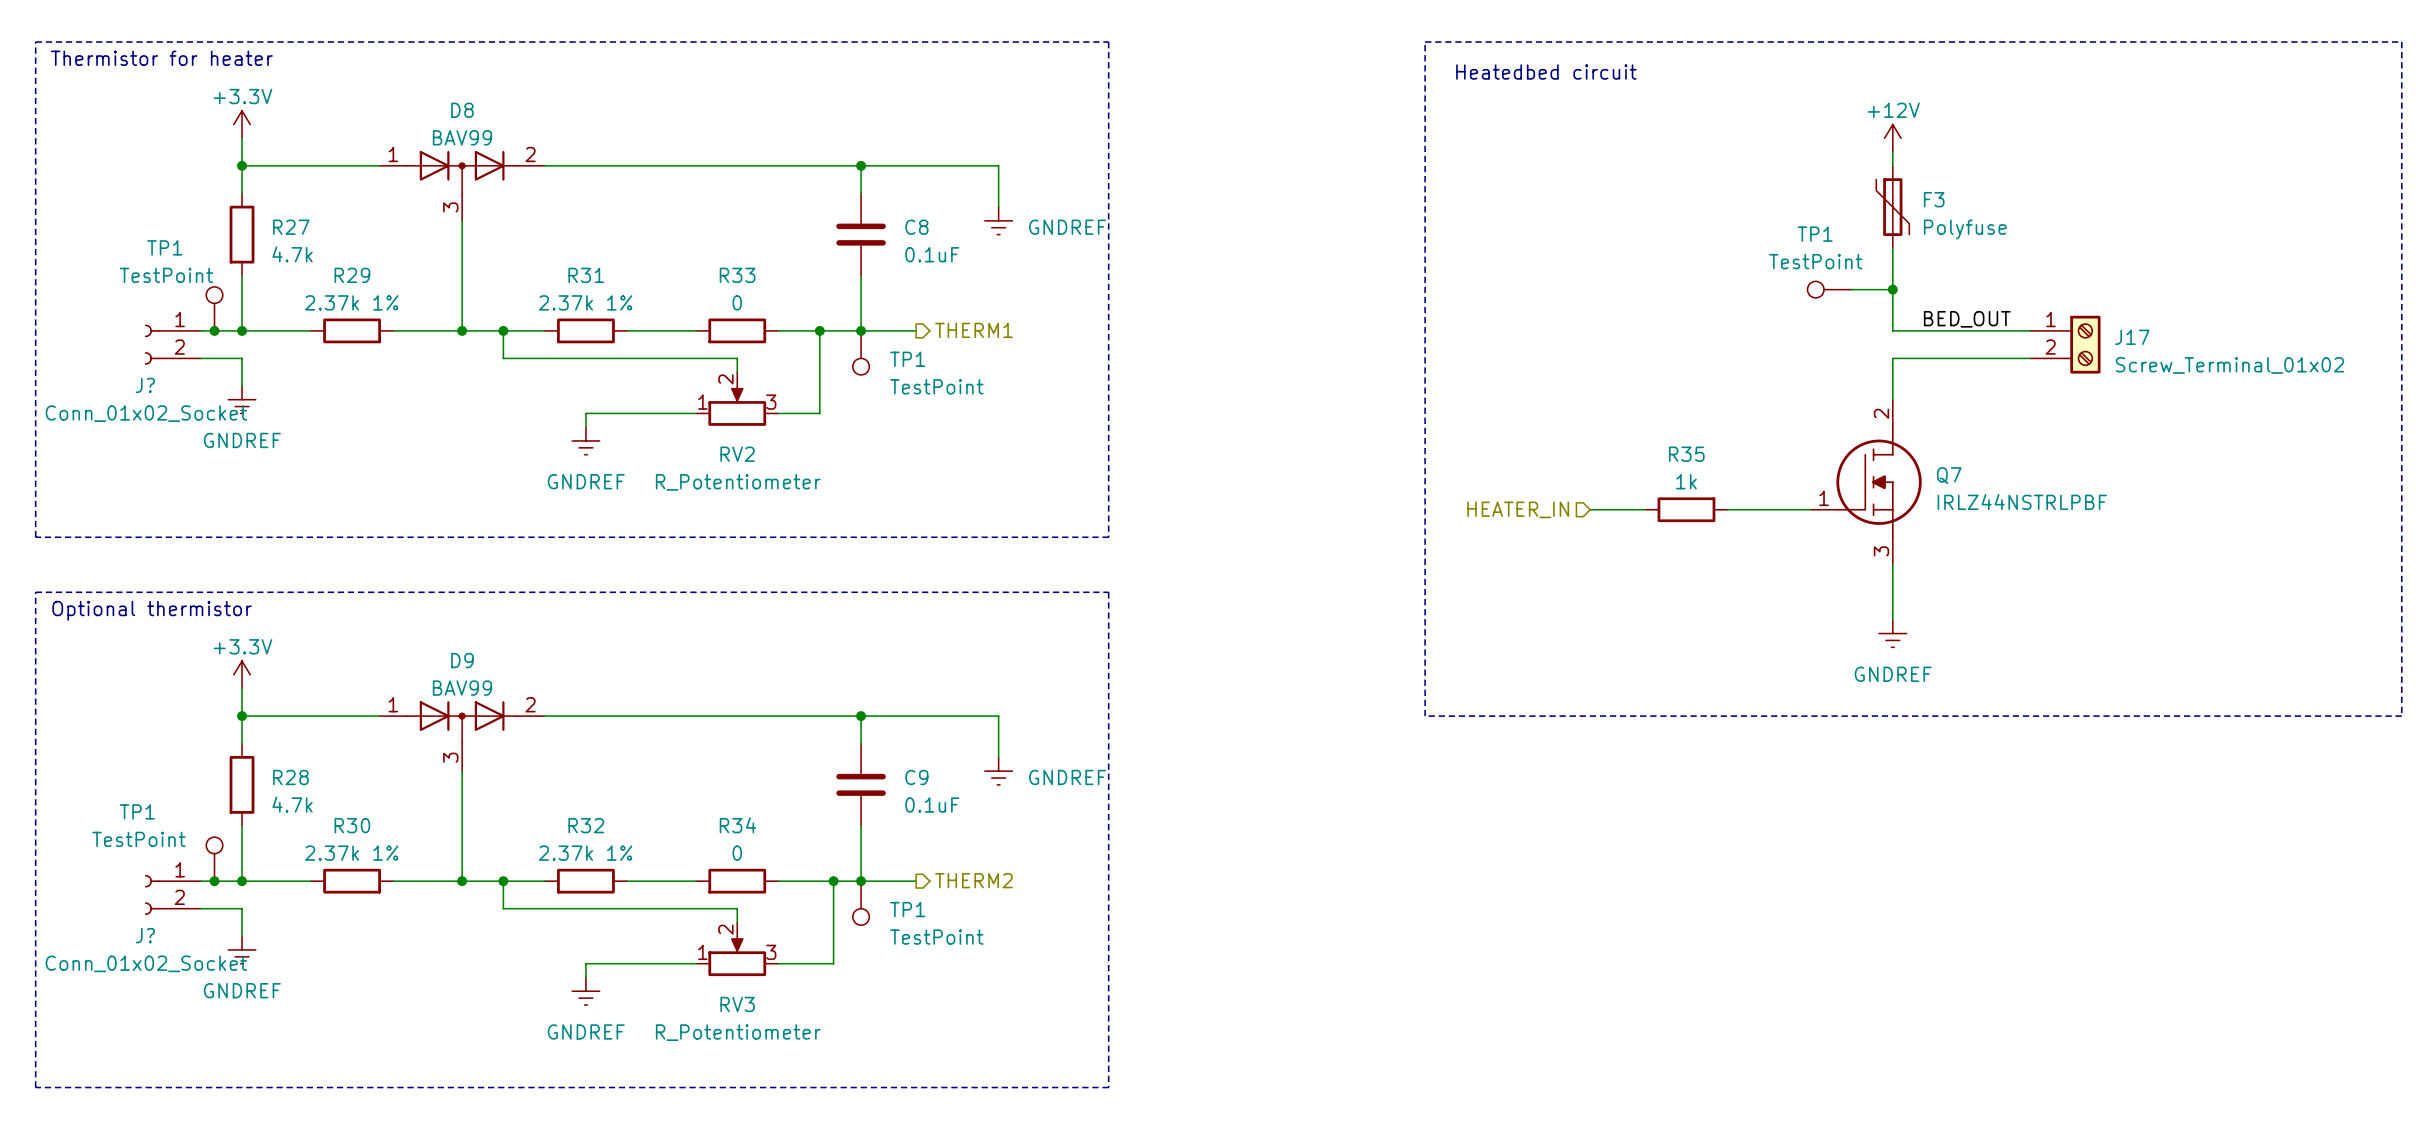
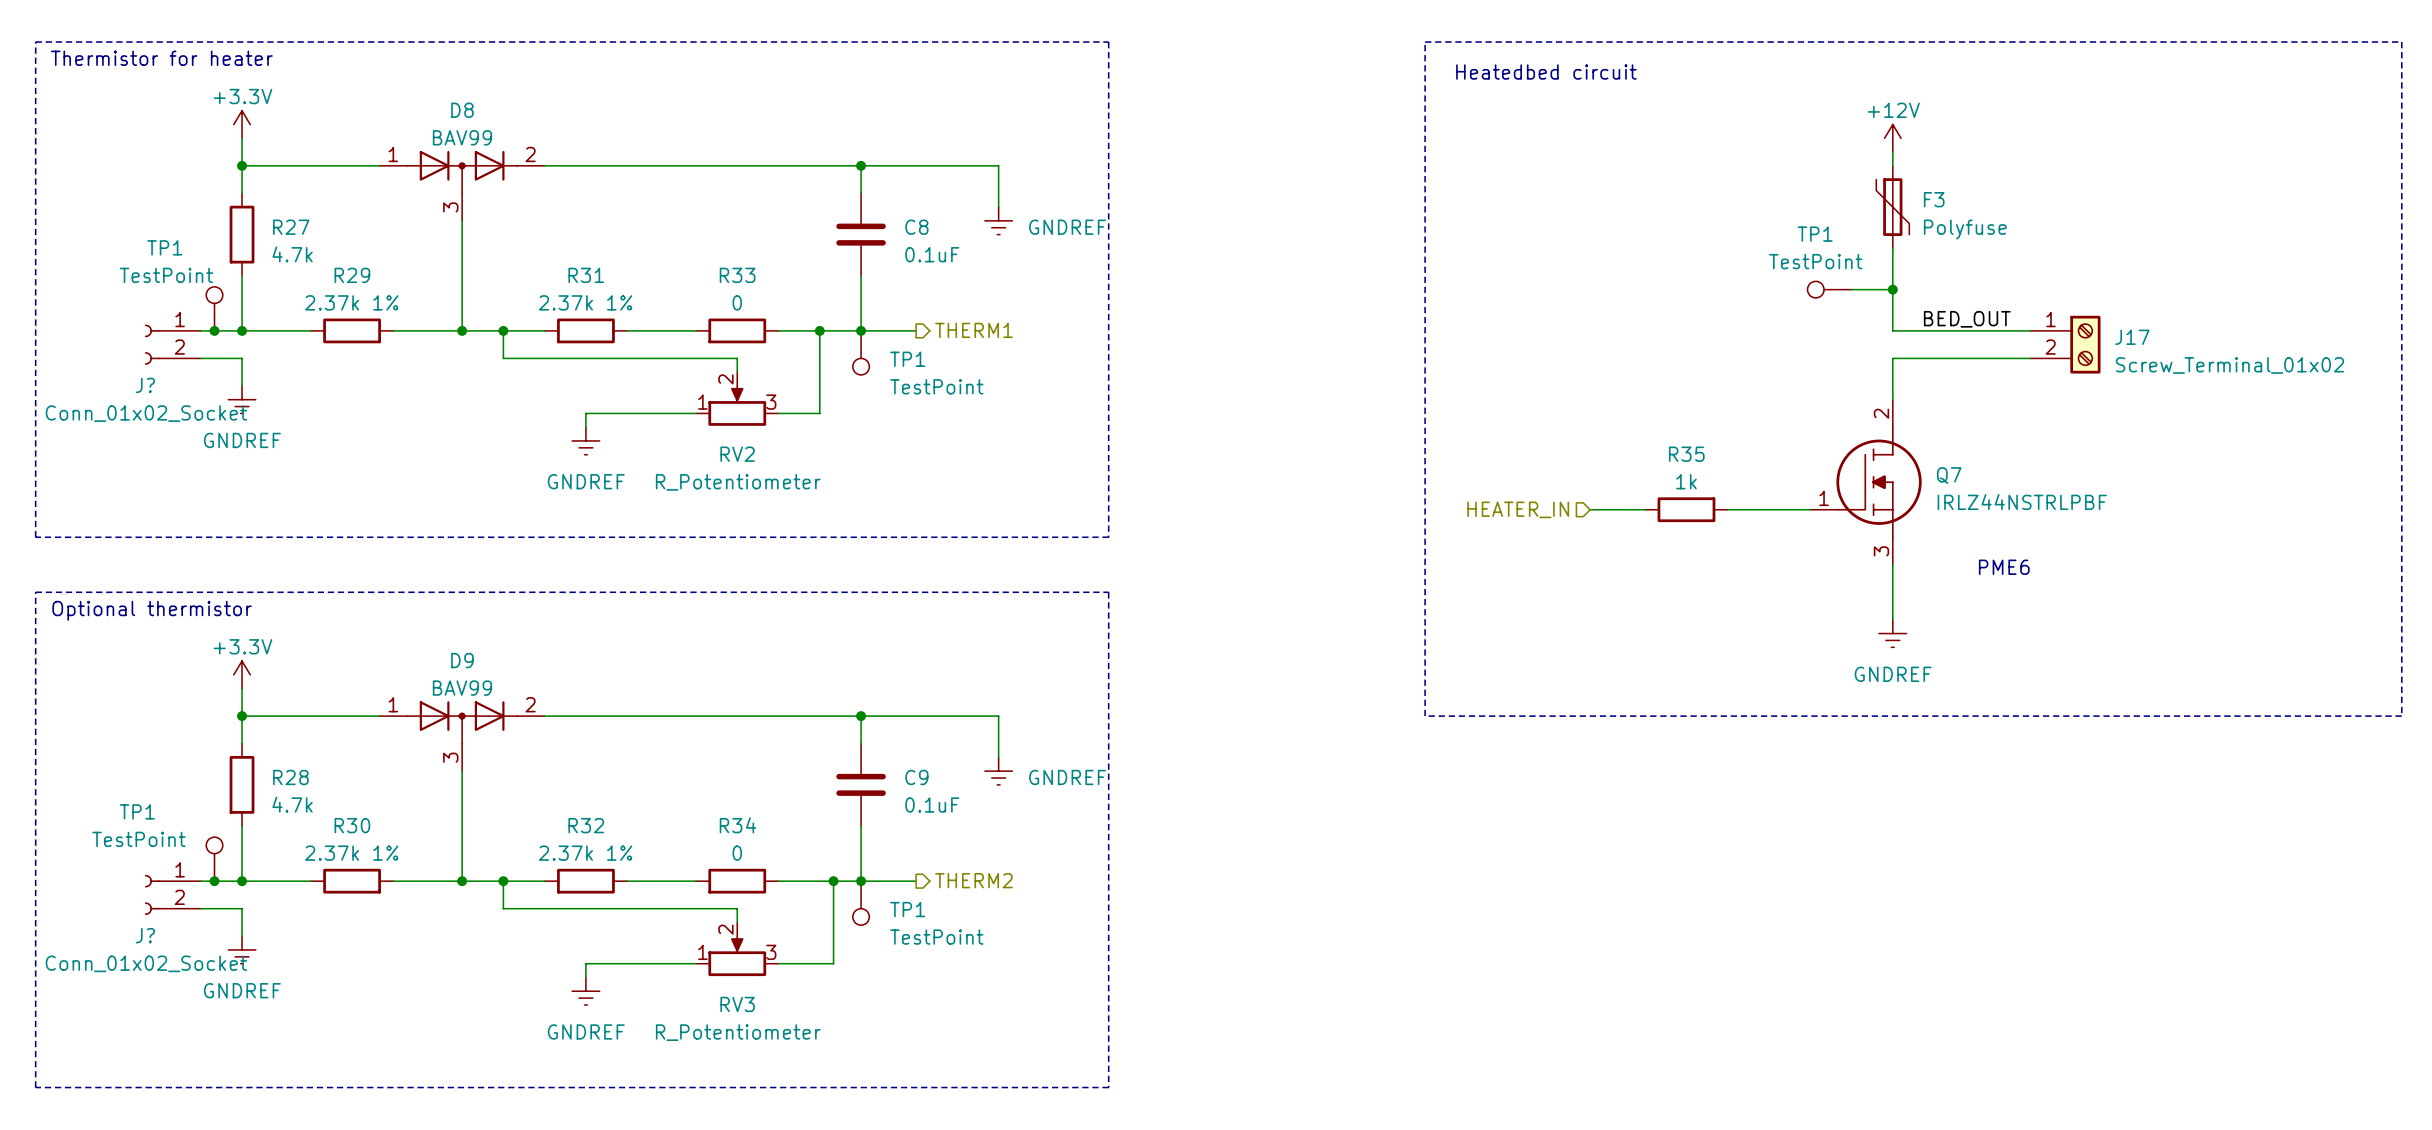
text: none -> PME6 (2004, 567)

